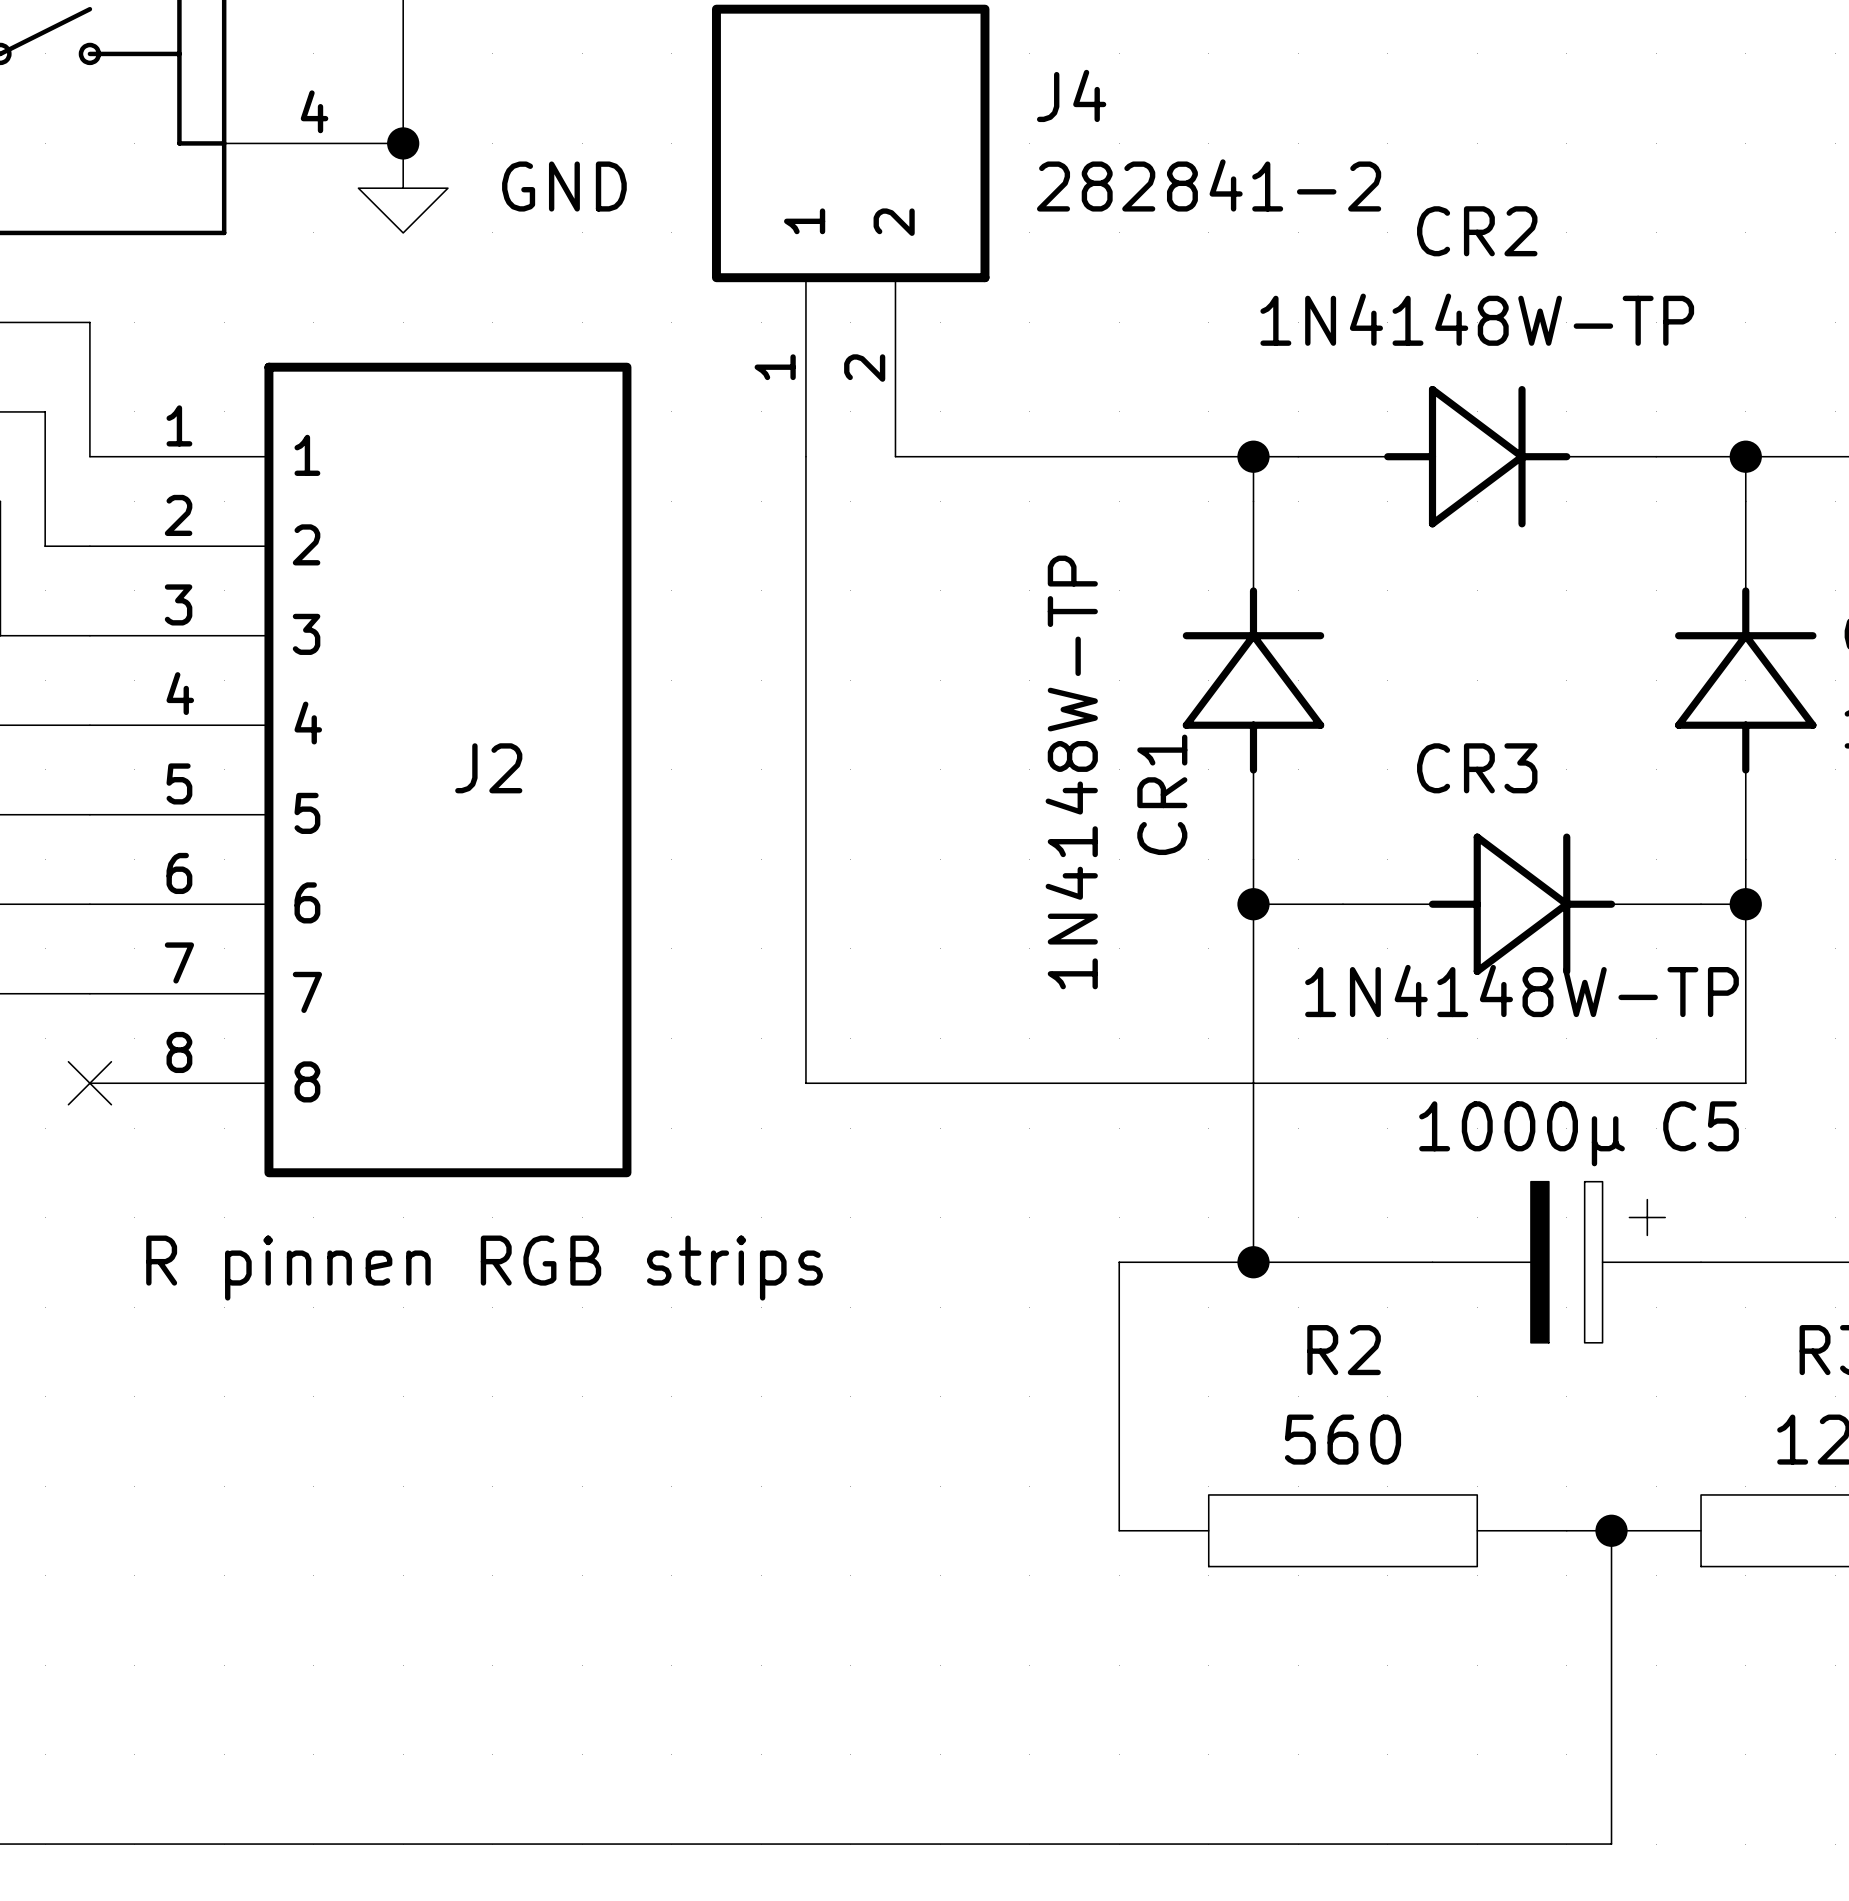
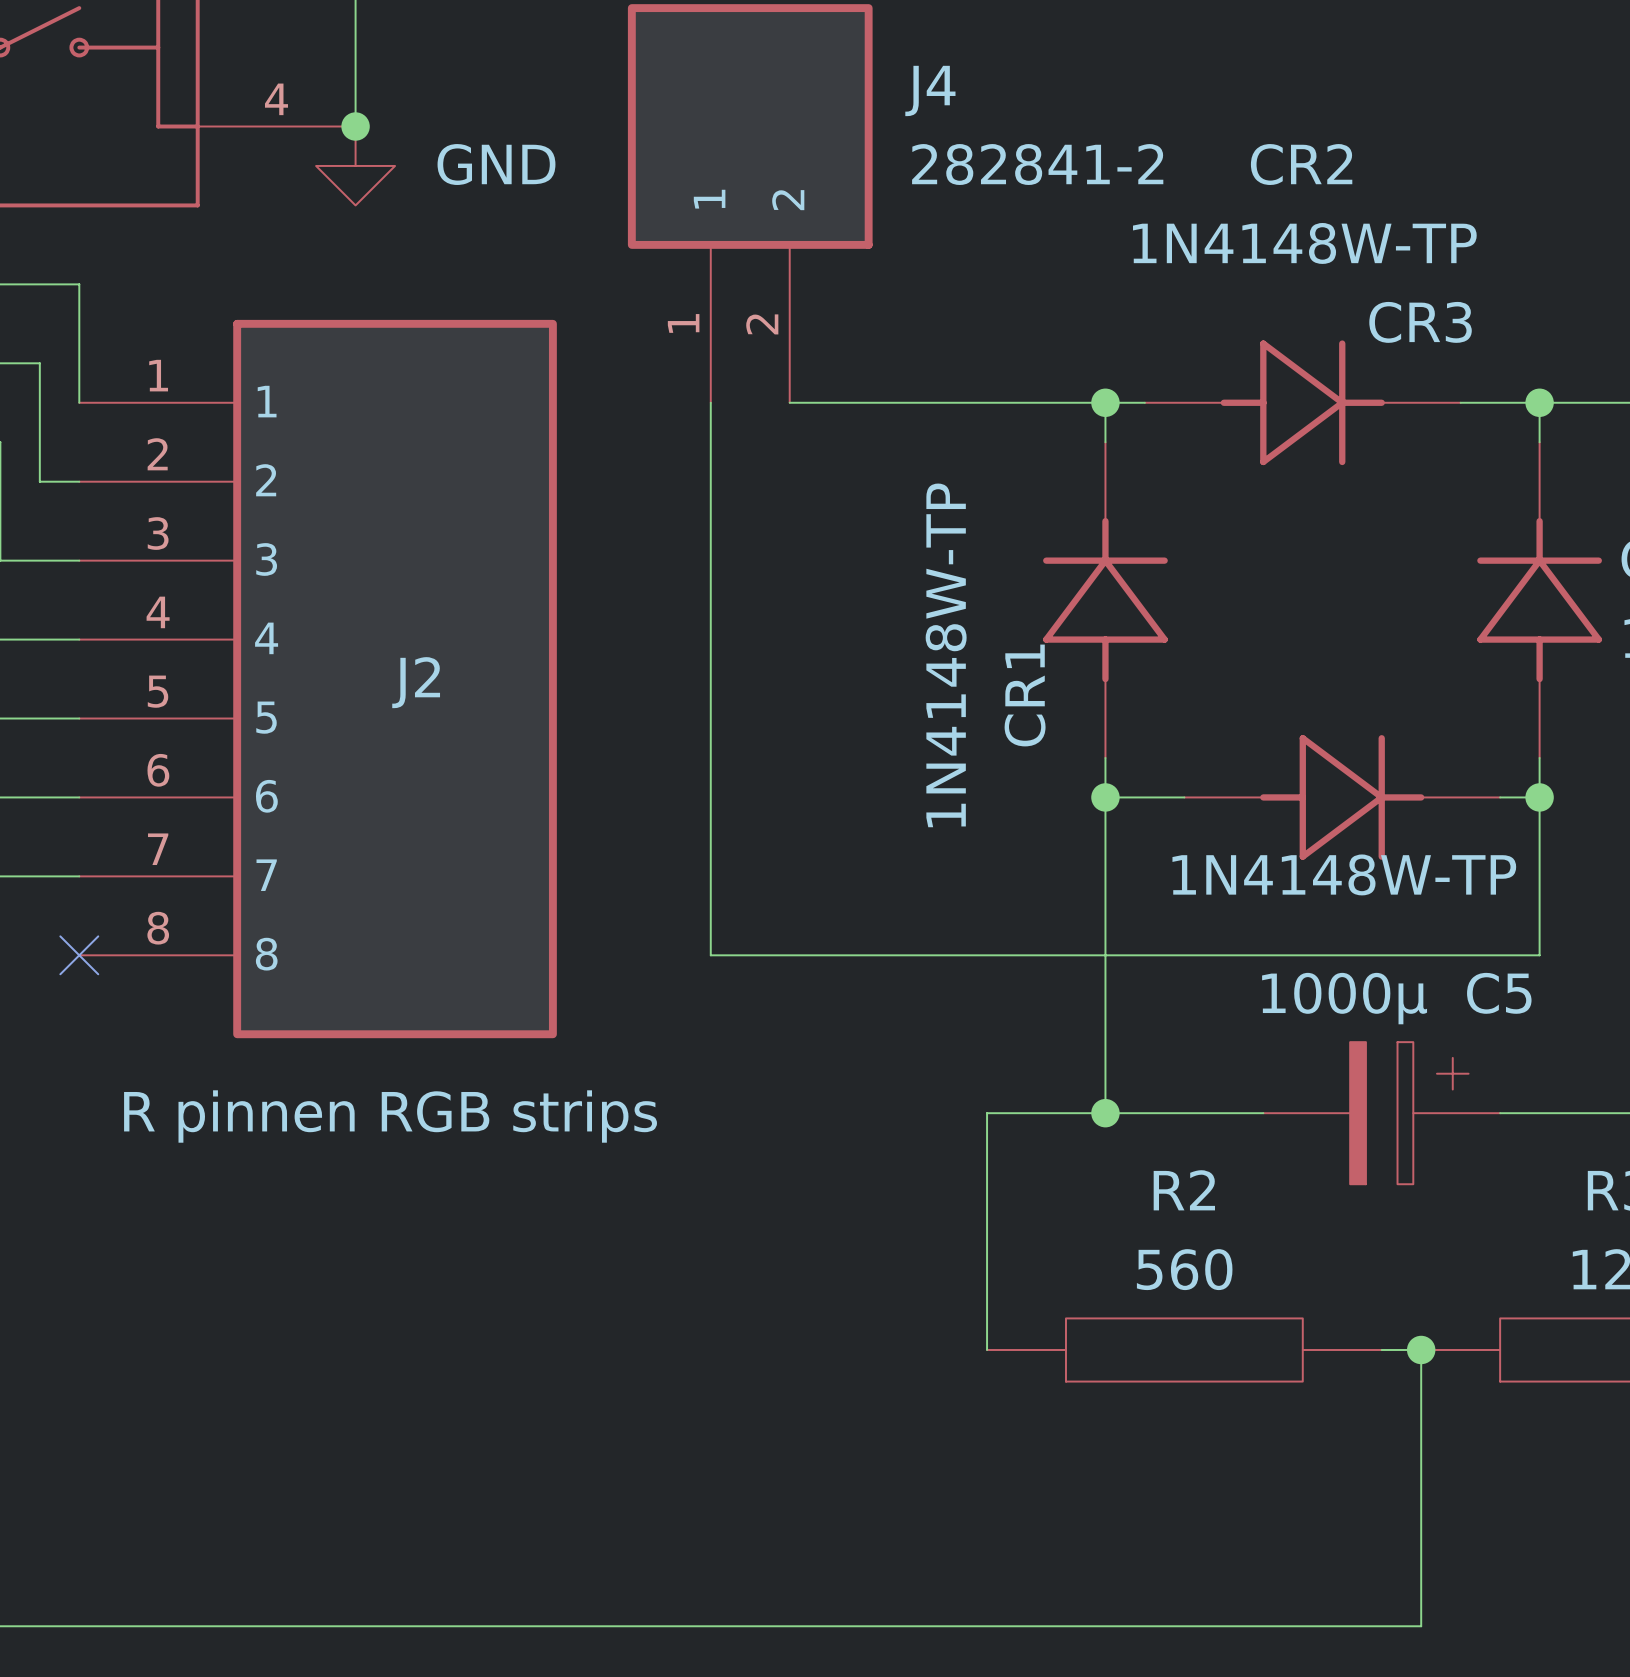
CR2 name position: CR2 (1477, 231) -> CR2 (1301, 164)
CR2 value position: 1N4148W-TP (1477, 319) -> 1N4148W-TP (1304, 243)
CR3 name position: CR3 (1477, 768) -> CR3 (1420, 322)

